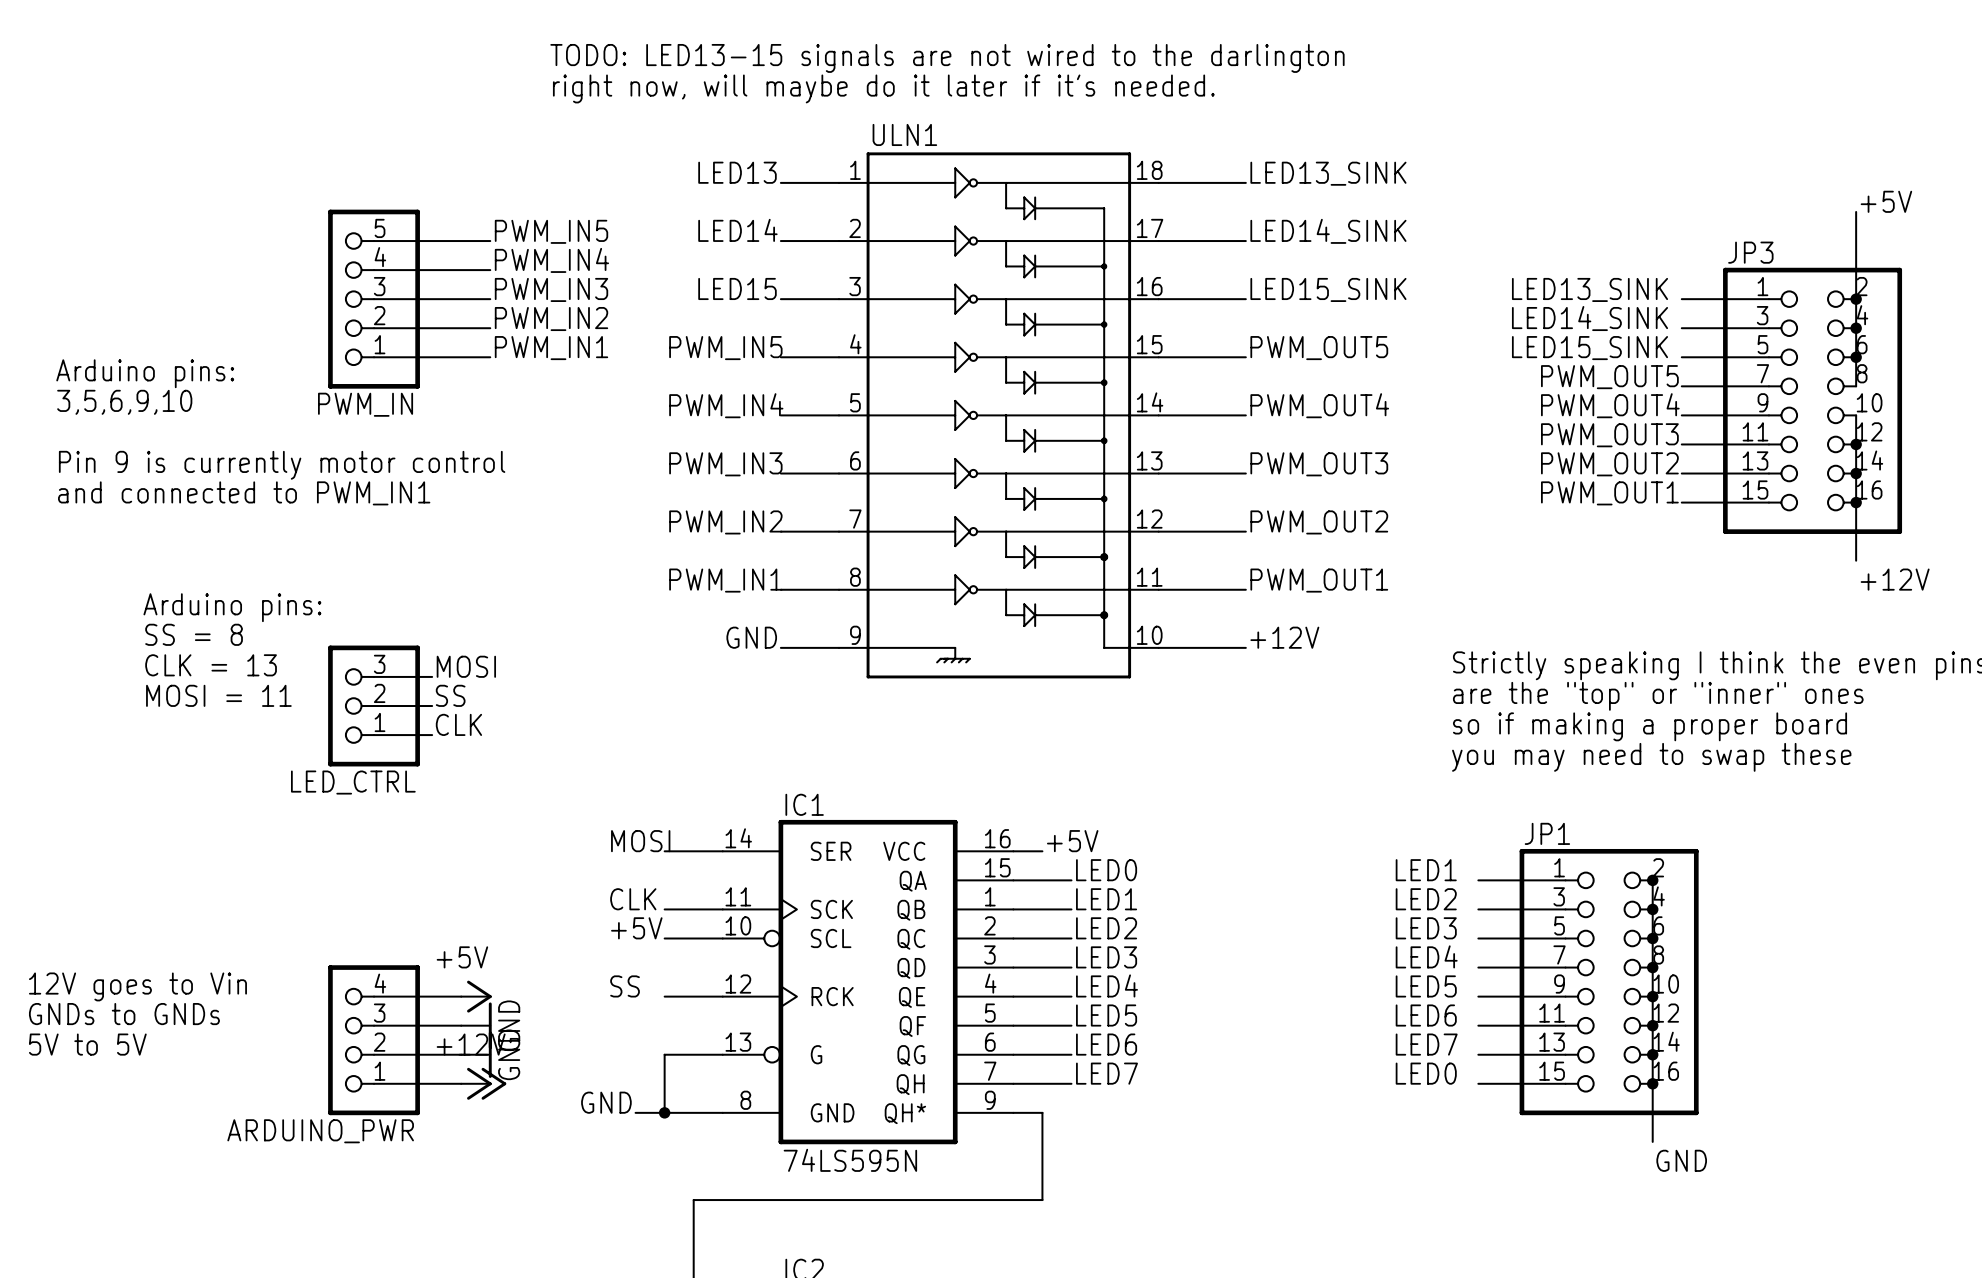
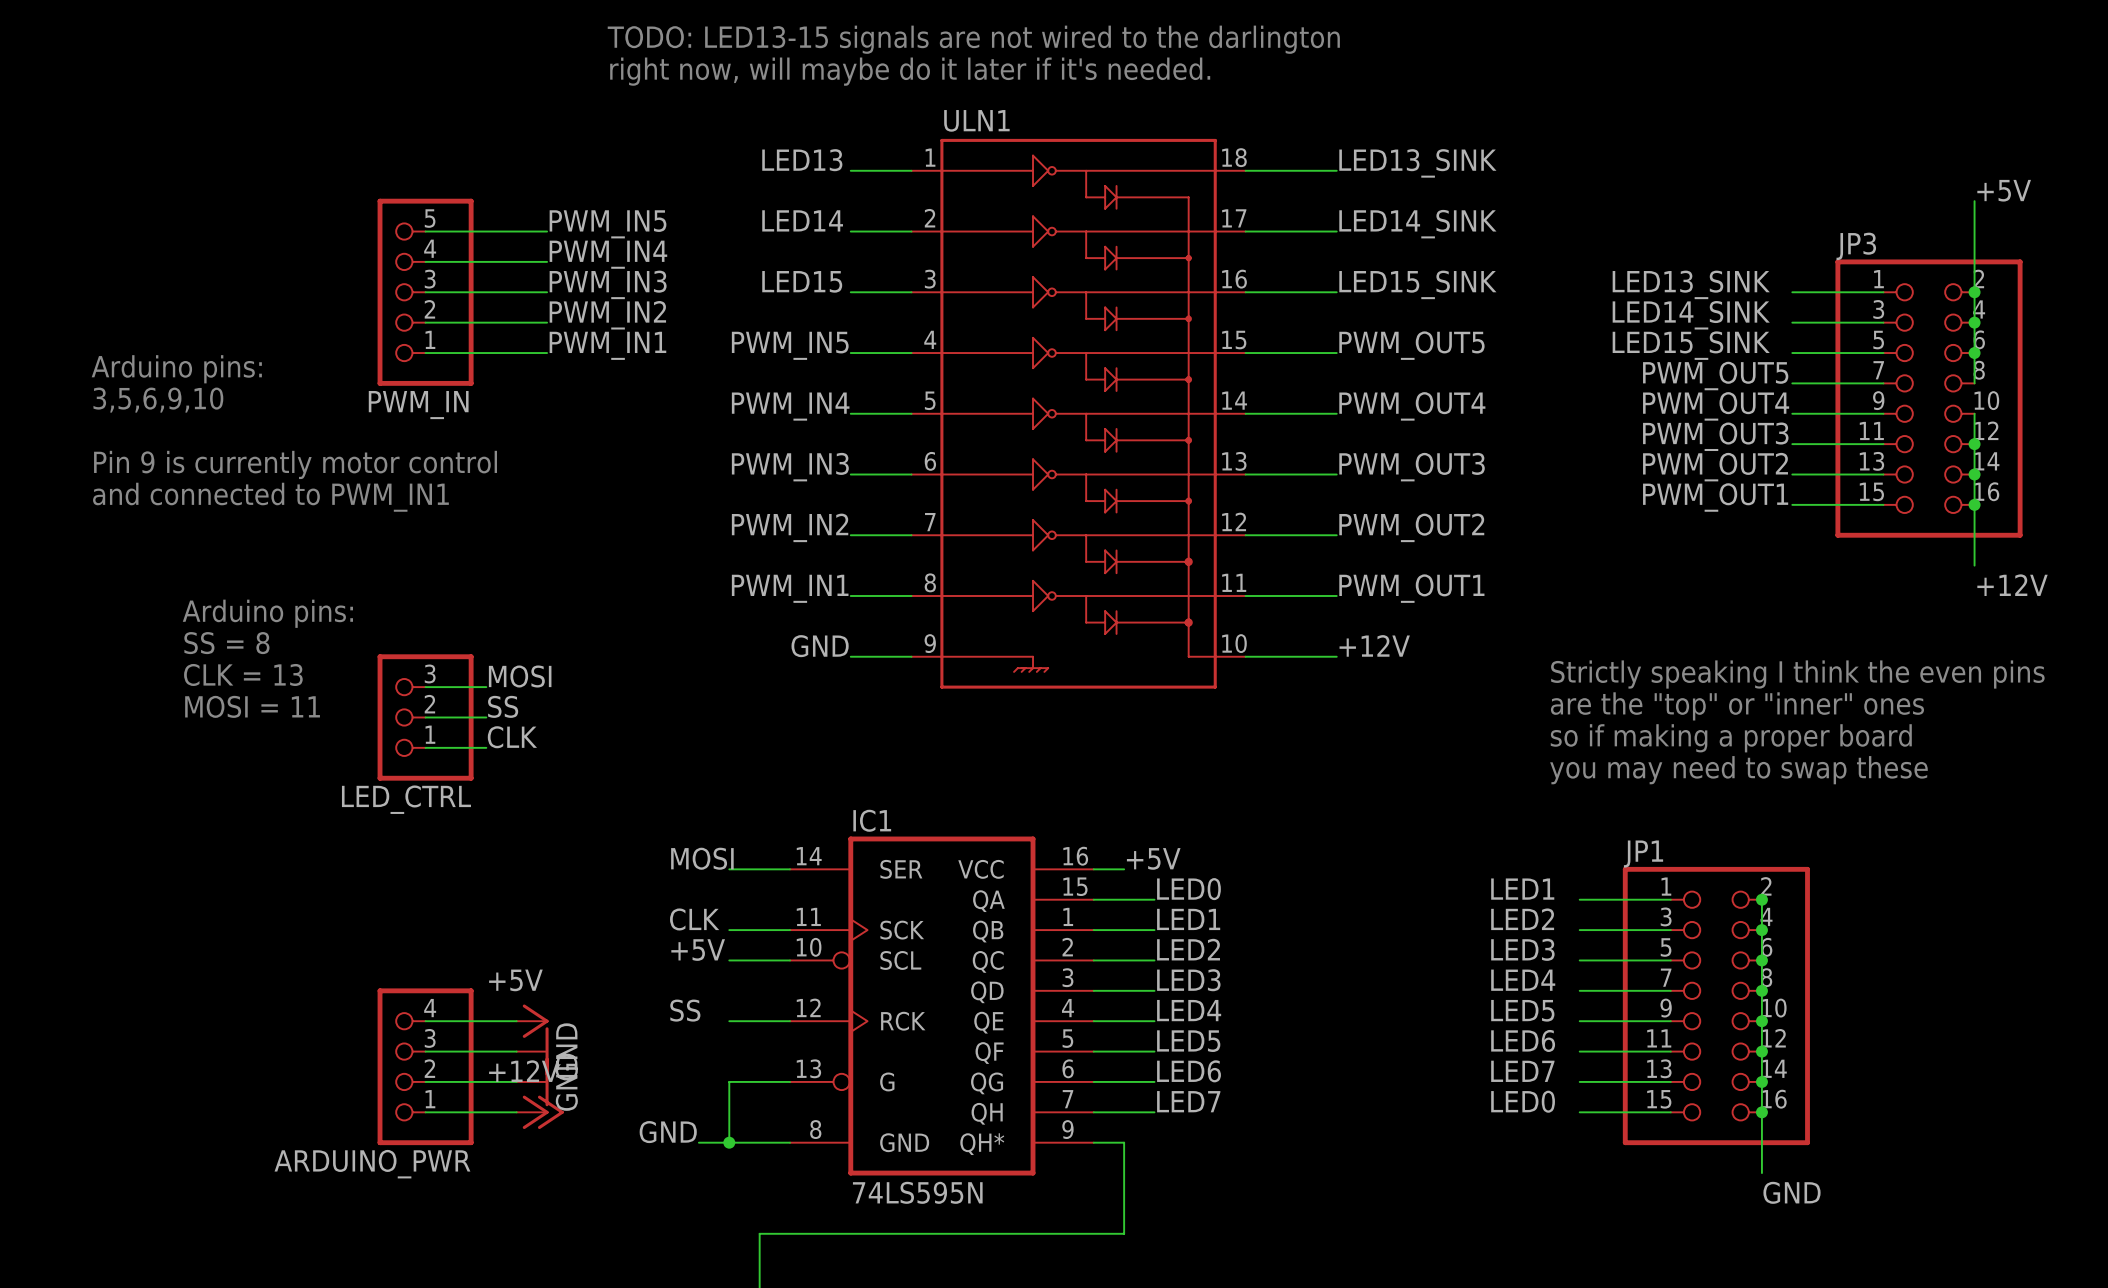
text: 12V goes to Vin (137, 986) -> none
text: GNDs to GNDs (124, 1014) -> none
text: 5V to 5V (87, 1044) -> none

